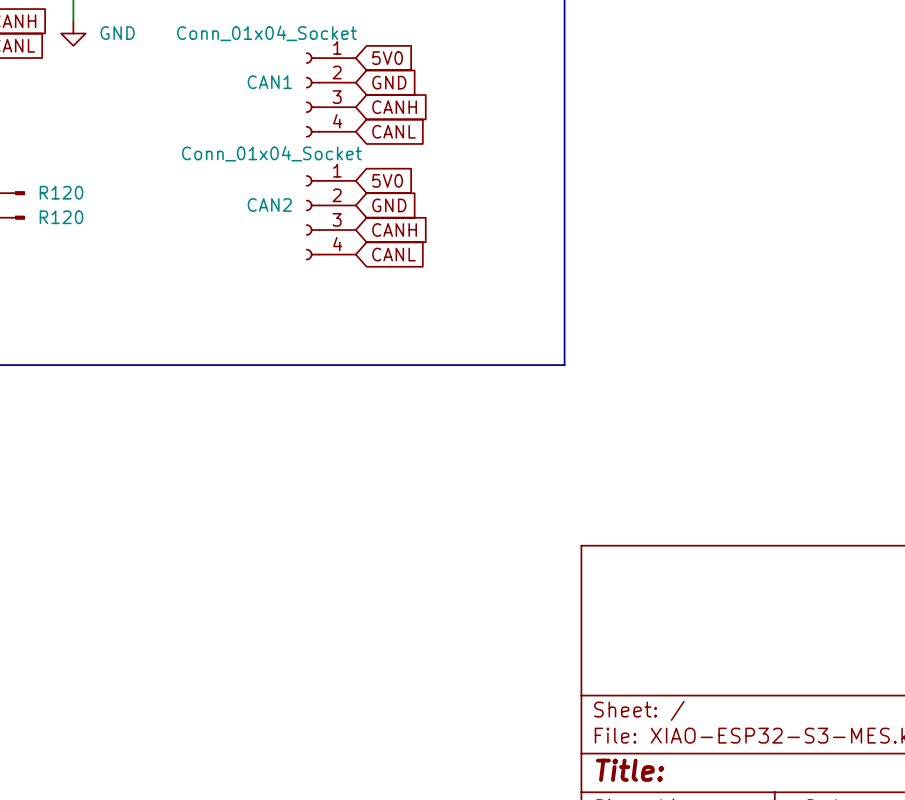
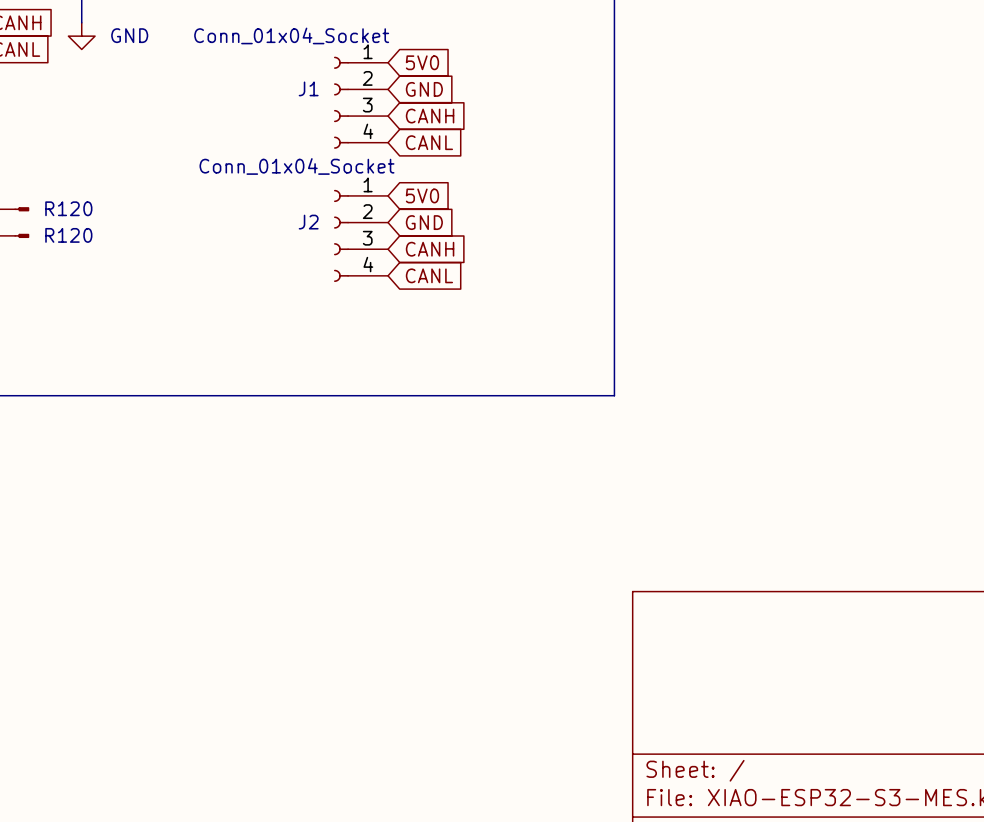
CAN1 name: CAN1 (269, 82) -> J1 (308, 88)
CAN2 name: CAN2 (269, 204) -> J2 (308, 222)

